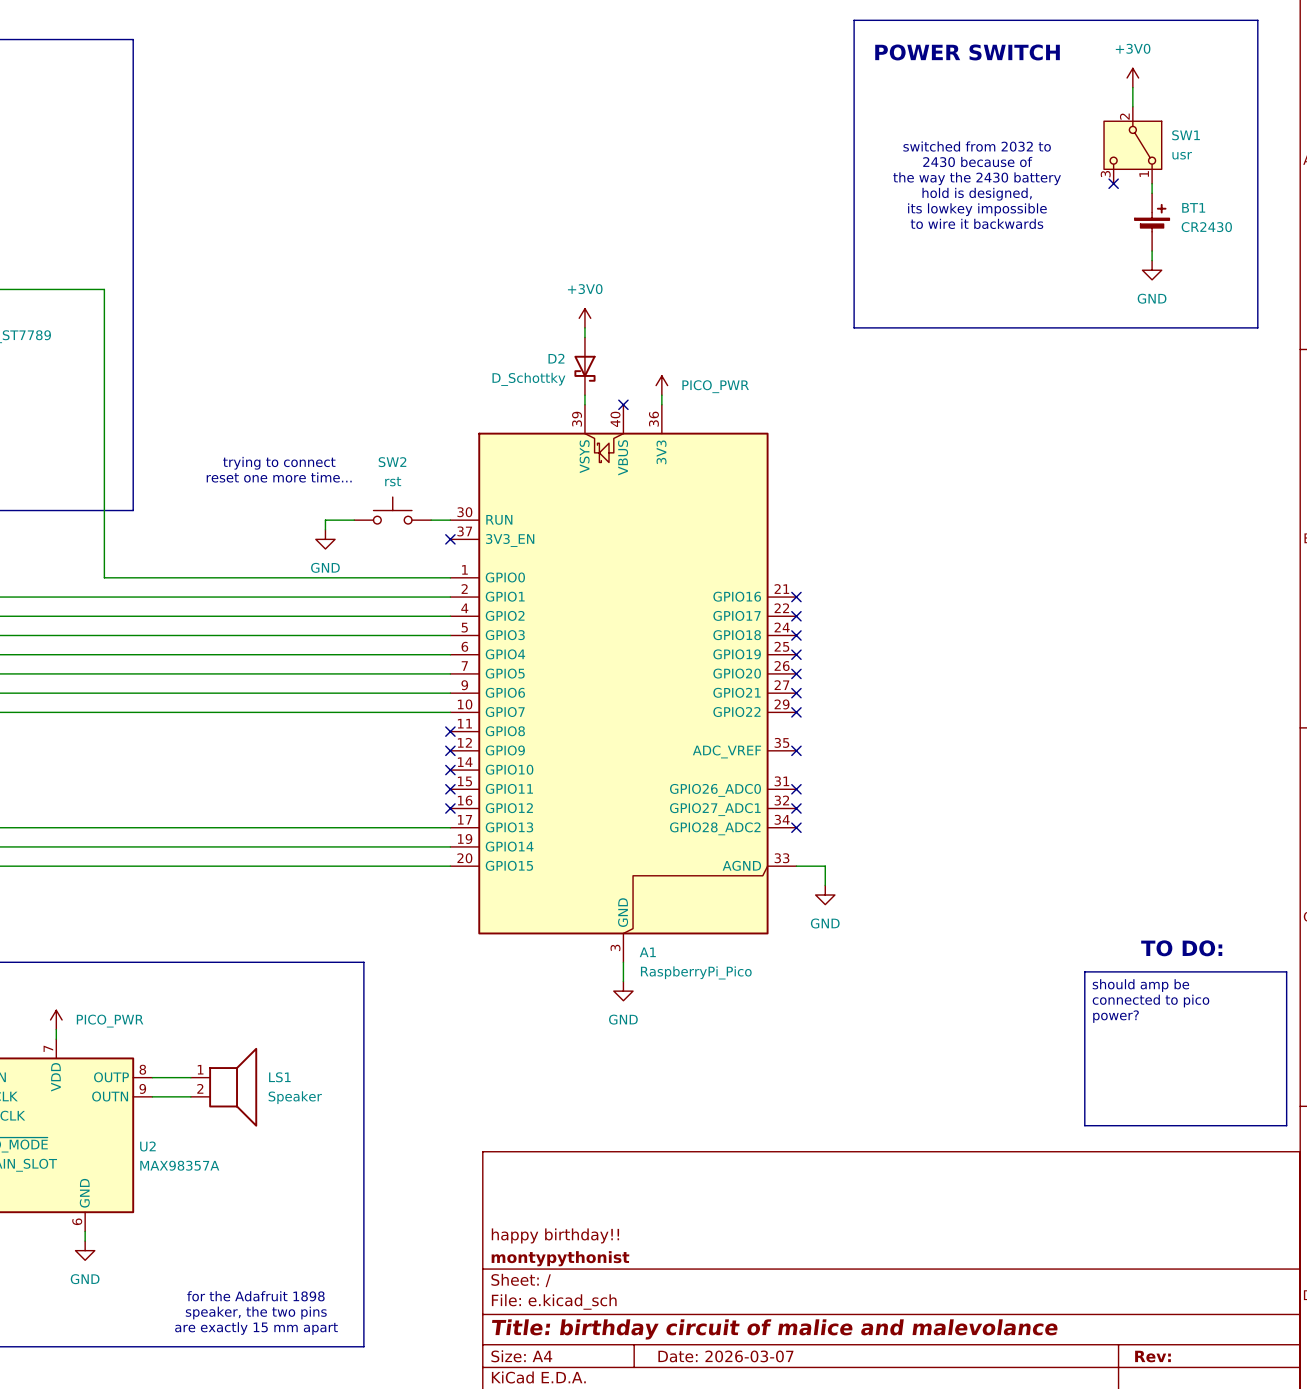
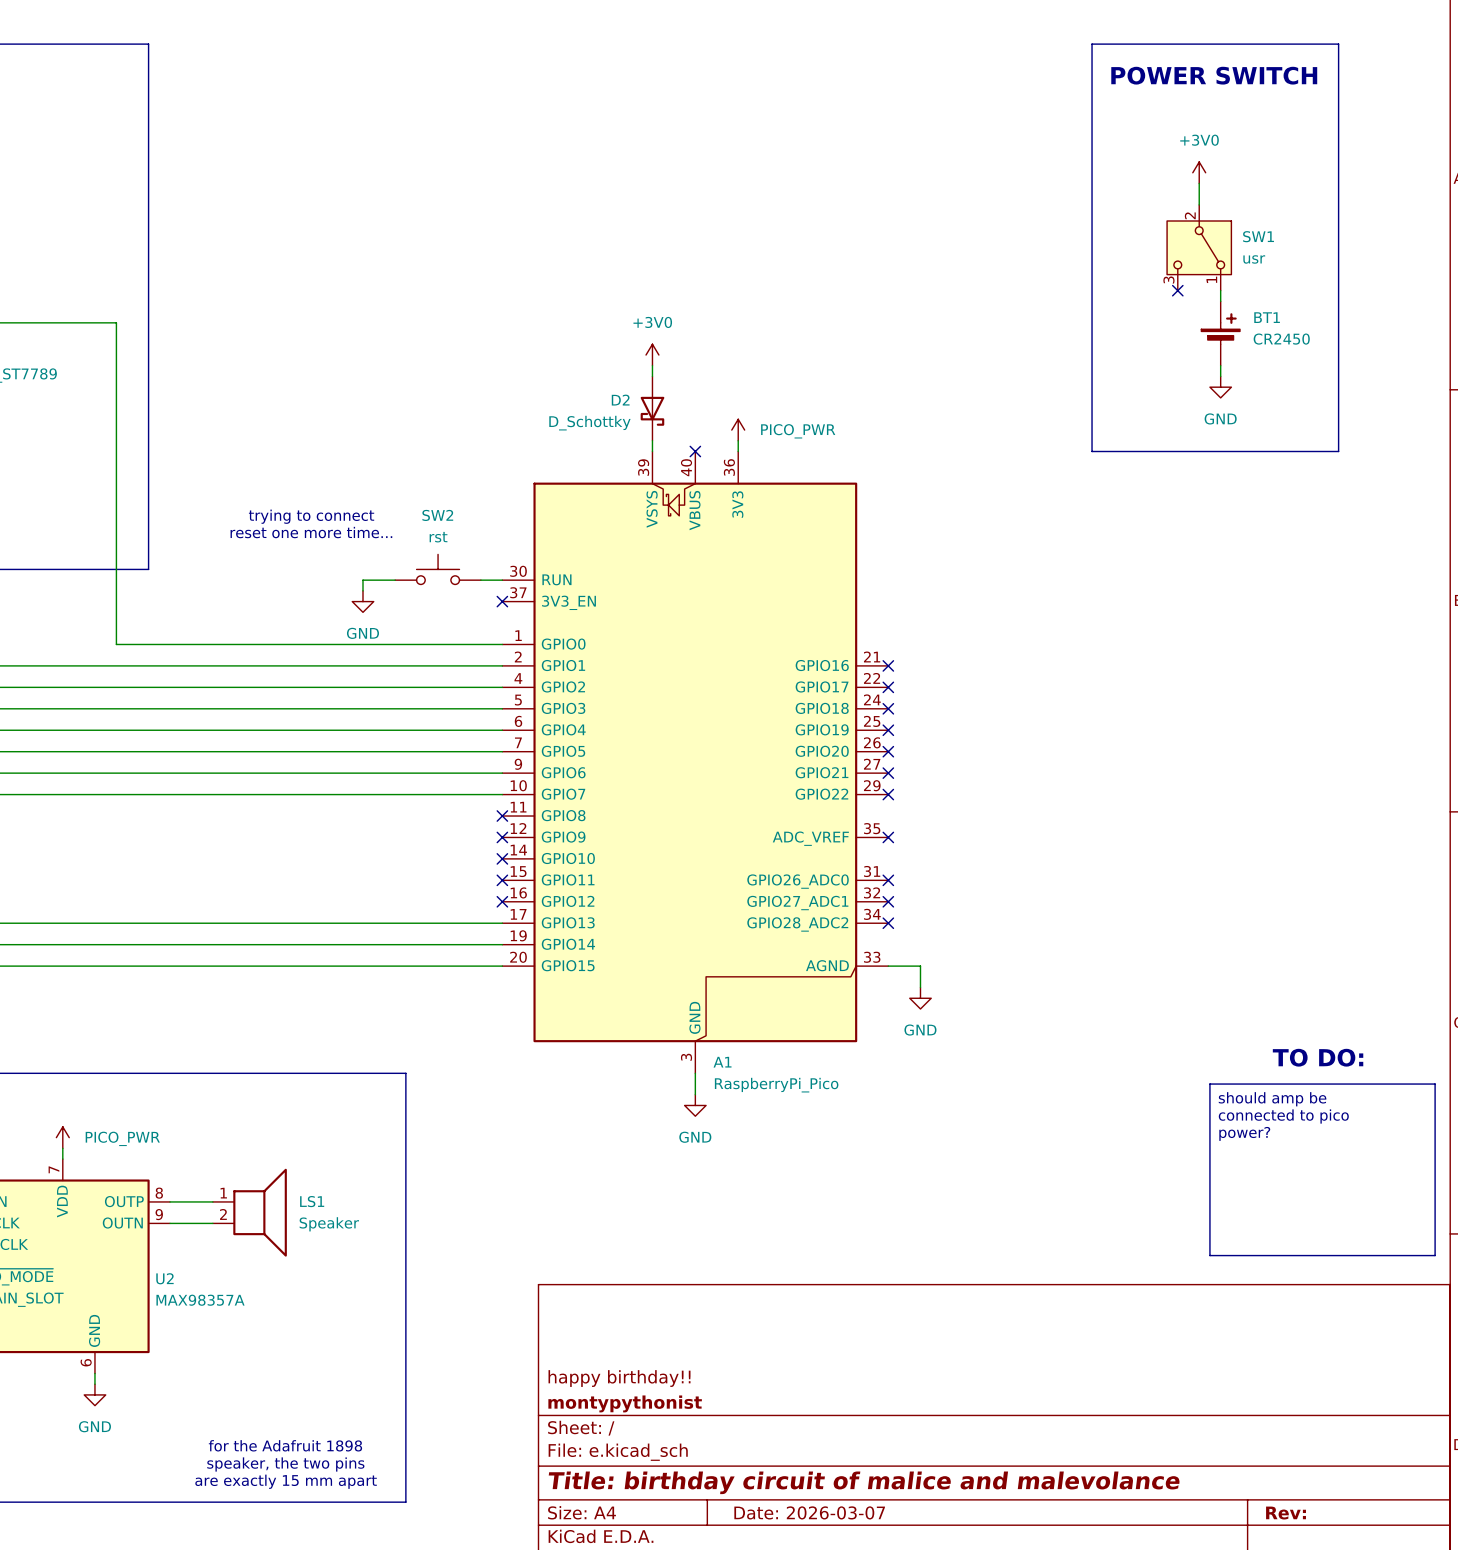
line: (854, 20) (1257, 20) (1257, 327) (854, 327) (854, 20) -> none
line: none -> (1092, 44) (1338, 44) (1338, 451) (1092, 451) (1092, 44)
text position: POWER SWITCH (967, 52) -> POWER SWITCH (1214, 75)
power symbol position: +3V0 (1132, 77) -> +3V0 (1199, 172)
wire: (1132, 87) (1132, 106) -> (1199, 183) (1199, 204)
SW1 position: (1132, 145) -> (1199, 247)
text: switched from 2032 to (977, 146) -> none
text: 2430 because of (977, 161) -> none
text: the way the 2430 battery (977, 178) -> none
no-connect mark: (1113, 183) -> none
wire: (1152, 183) (1152, 193) -> (1220, 290) (1220, 301)
text: hold is designed, (977, 194) -> none
text: its lowkey impossible (977, 209) -> none
BT1 position: (1152, 222) -> (1220, 333)
text: to wire it backwards (977, 223) -> none
BT1 value: CR2430 (1206, 227) -> CR2450 (1281, 339)
wire: (1152, 251) (1152, 260) -> (1220, 365) (1220, 376)
no-connect mark: none -> (1177, 290)
power symbol position: GND (1152, 270) -> GND (1220, 387)

